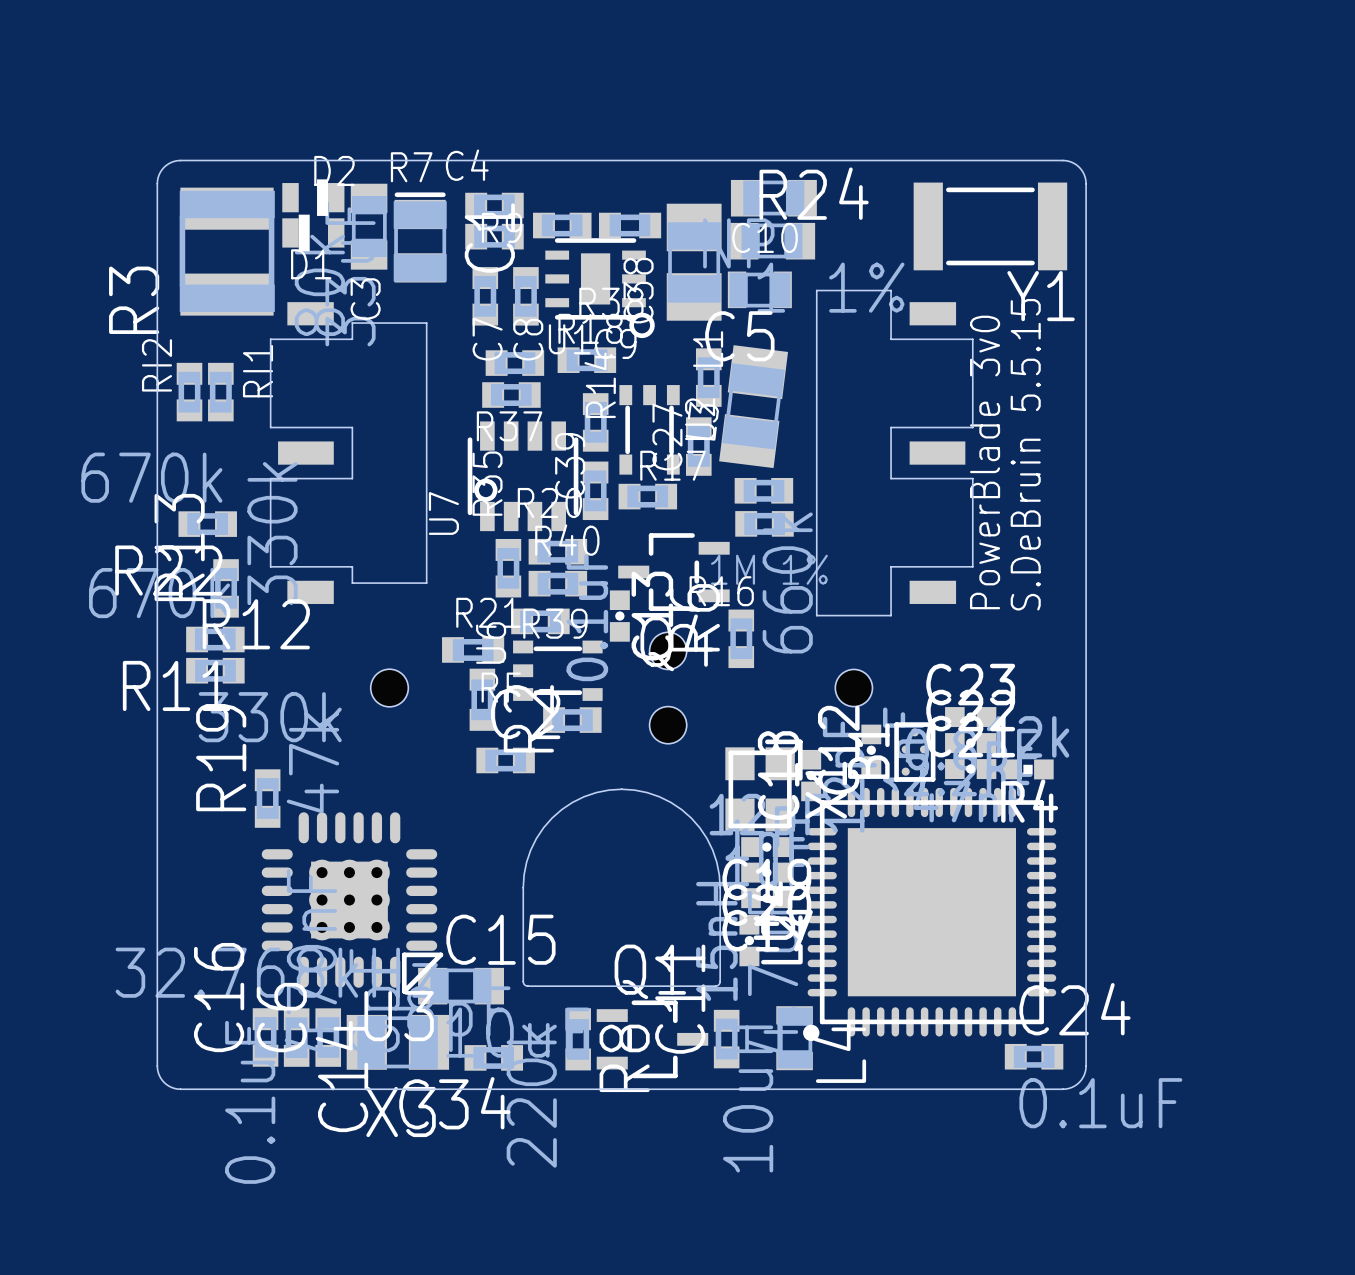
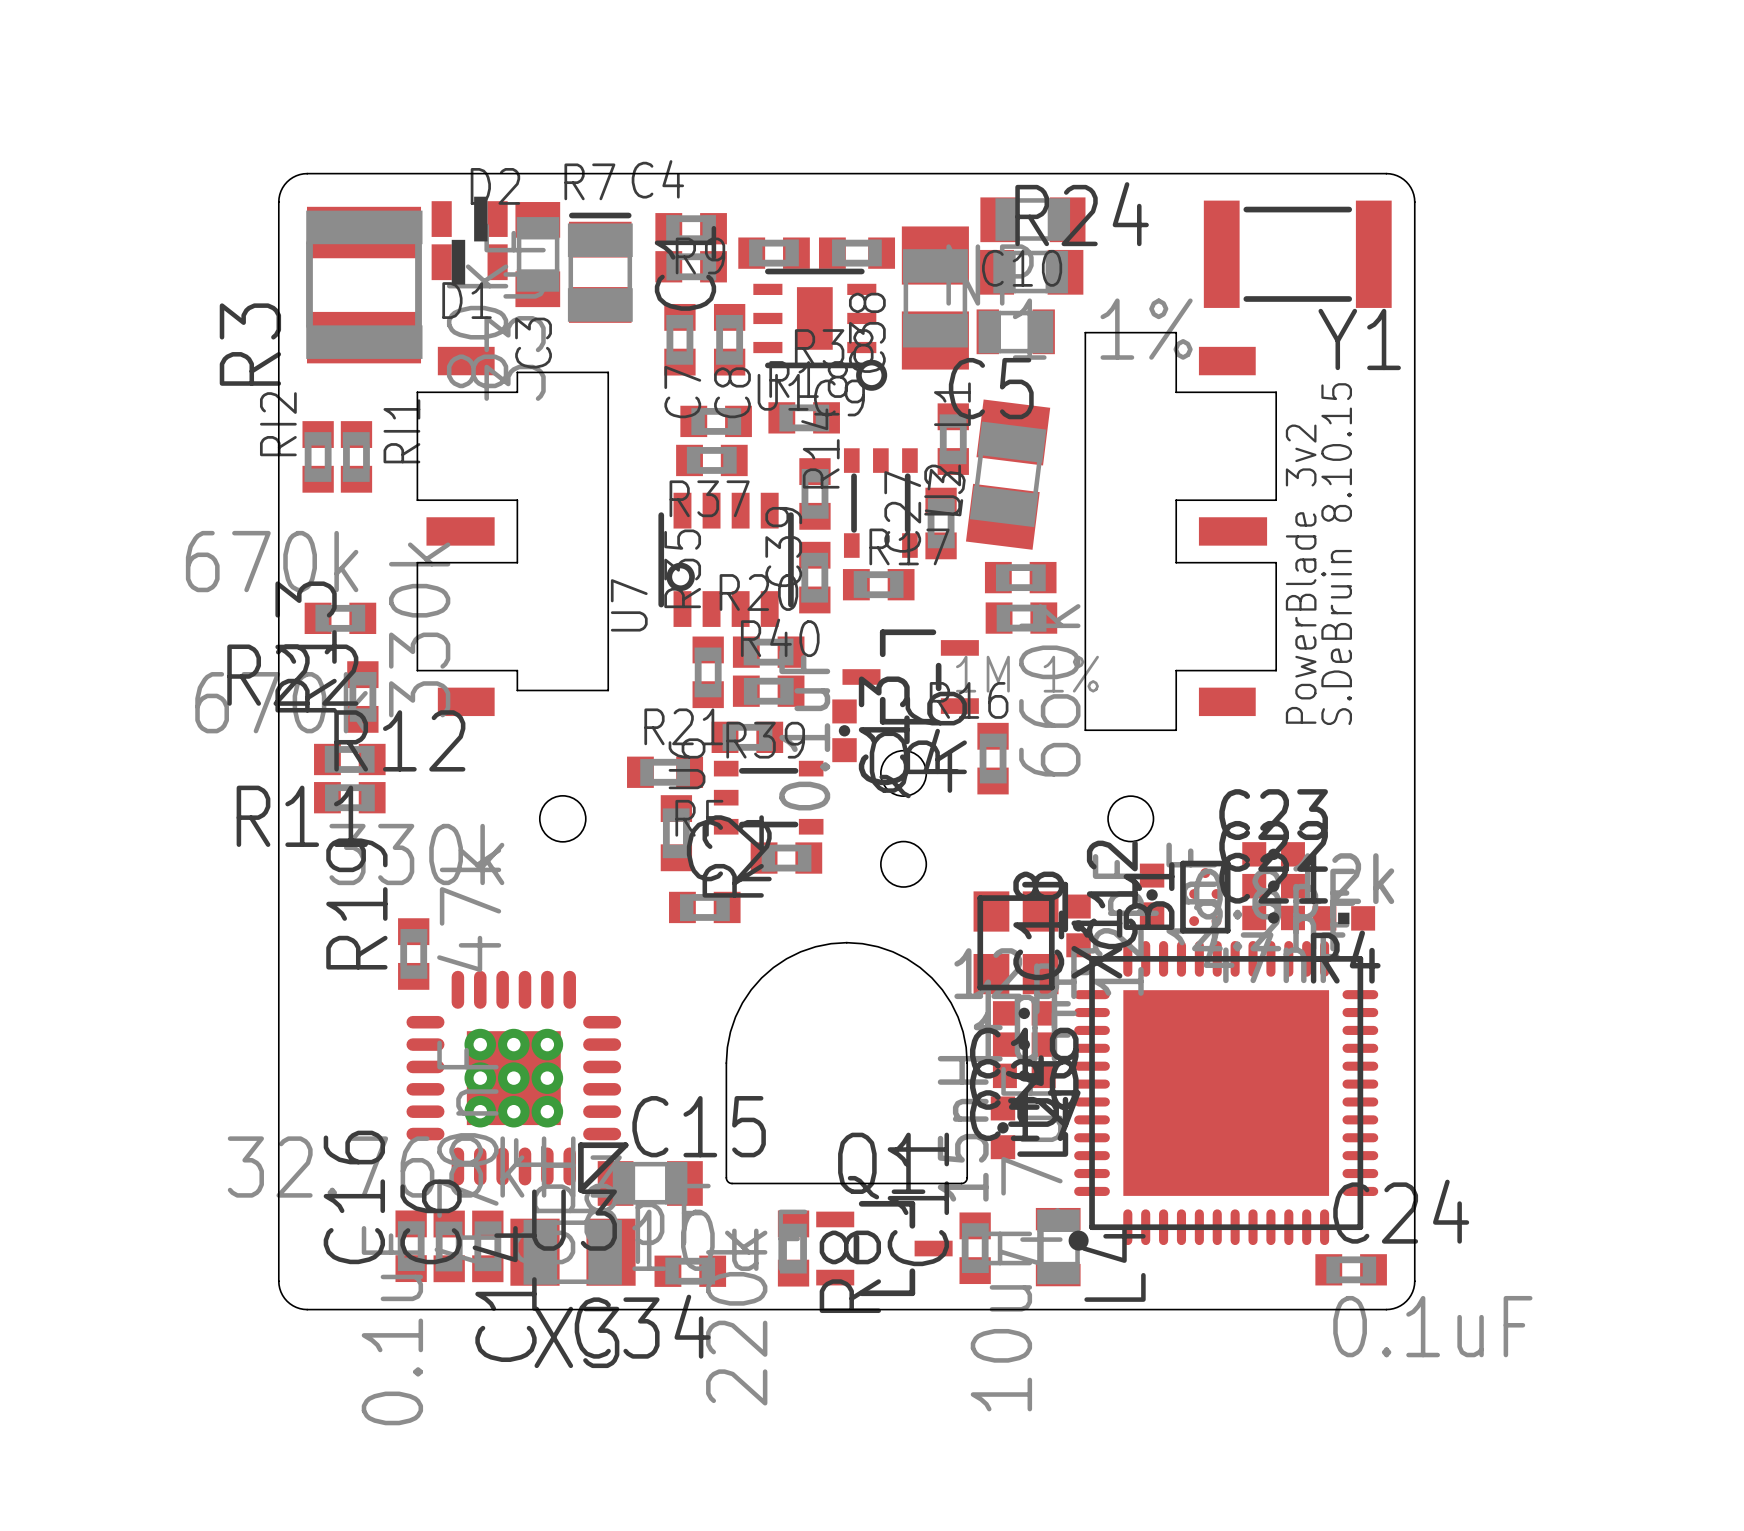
text: S.DeBruin 5.5.15 (1025, 454) -> S.DeBruin 8.10.15 (1336, 554)
text: PowerBlade 3v0 (985, 462) -> PowerBlade 3v2 (1301, 574)

